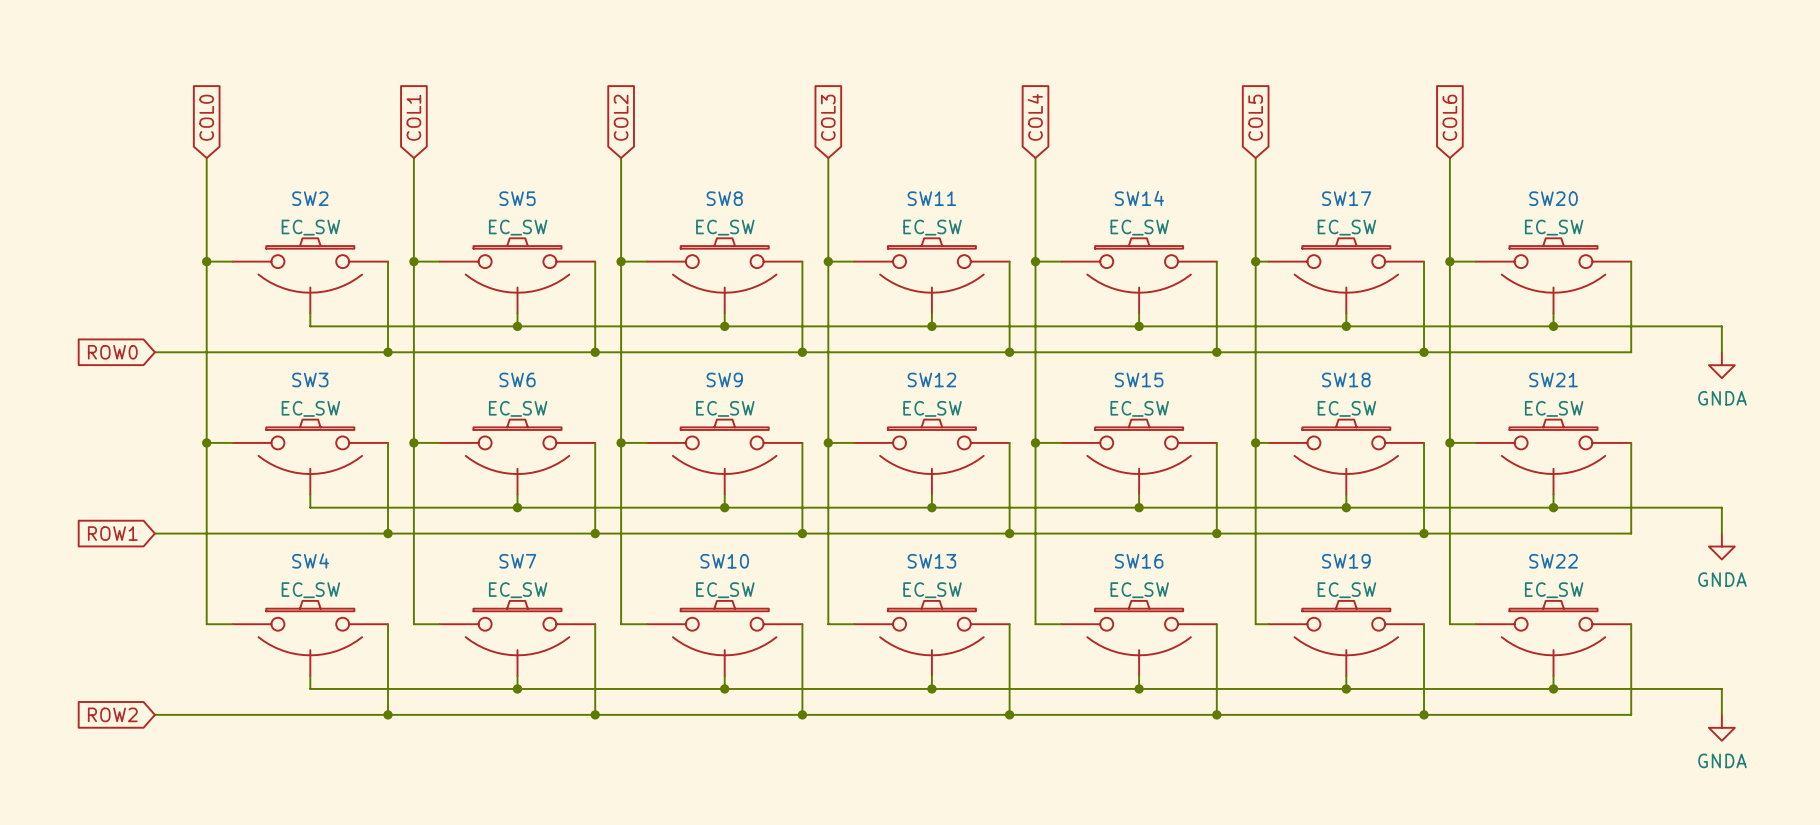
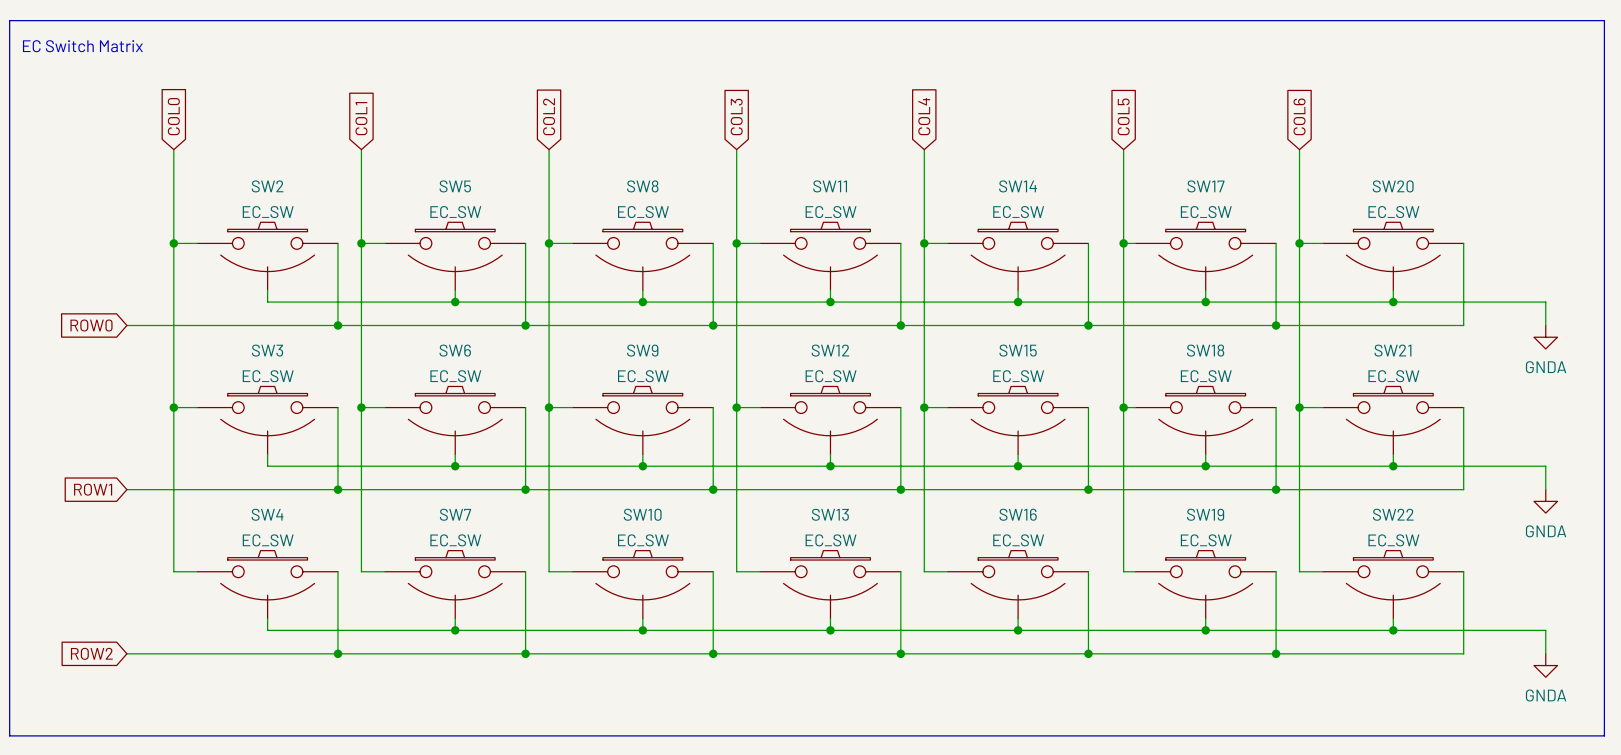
line: none -> (9, 20) (1604, 20) (1604, 735) (9, 735) (9, 20)
text: none -> EC Switch Matrix (82, 46)

